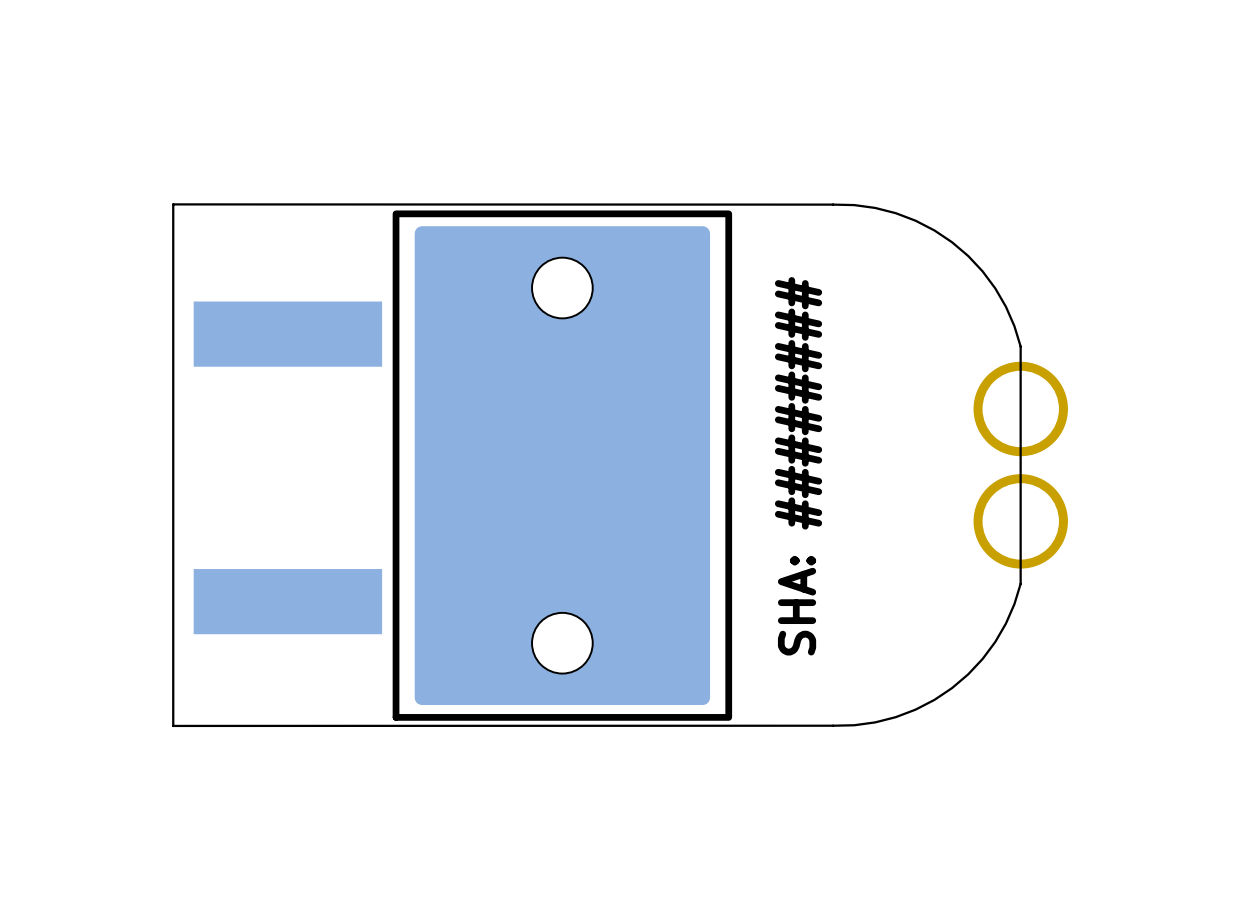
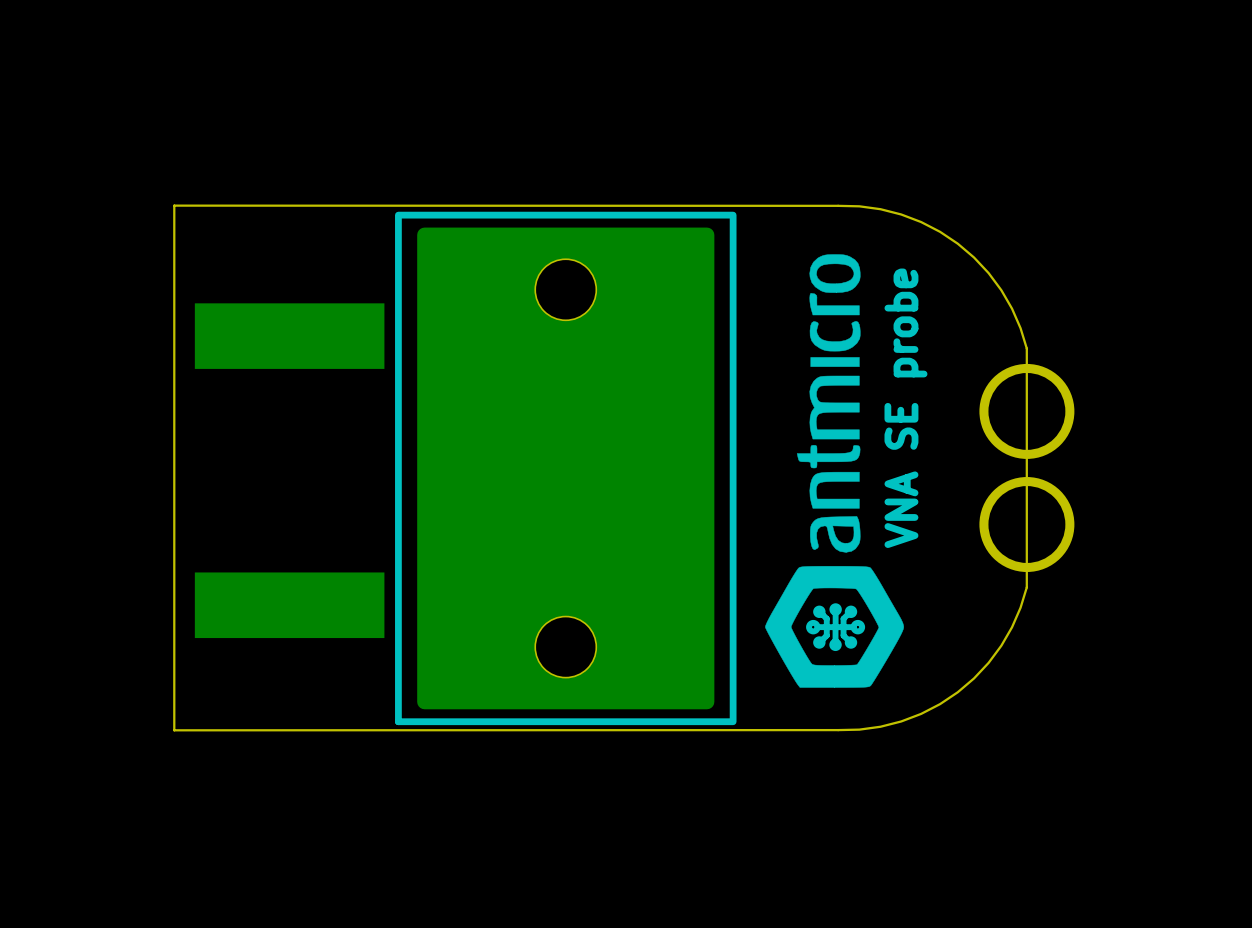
drawing: none -> [765, 254, 904, 688]
text: none -> VNA SE probe (905, 408)
text: SHA: ######## (798, 466) -> none

